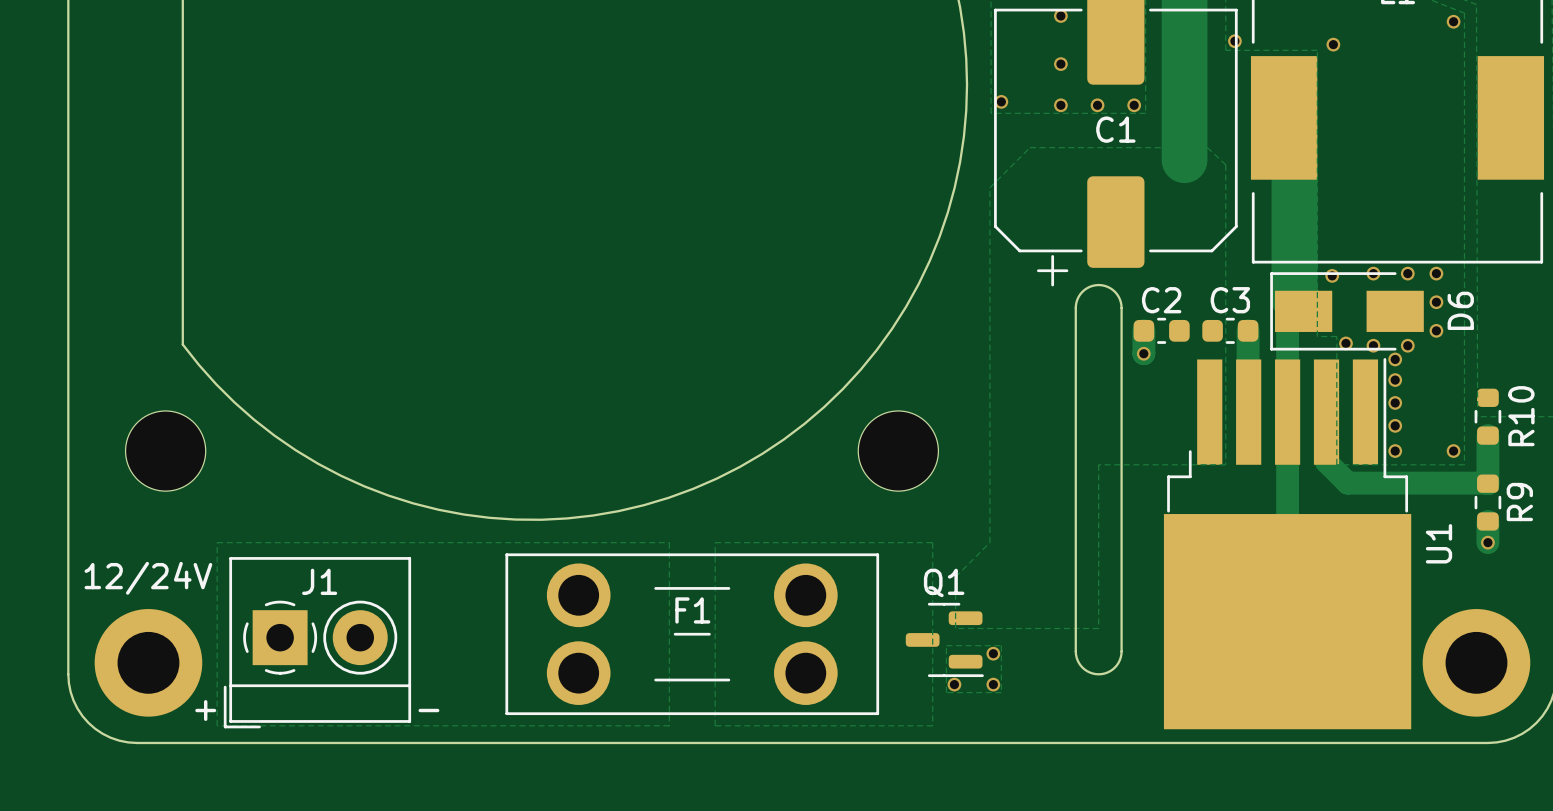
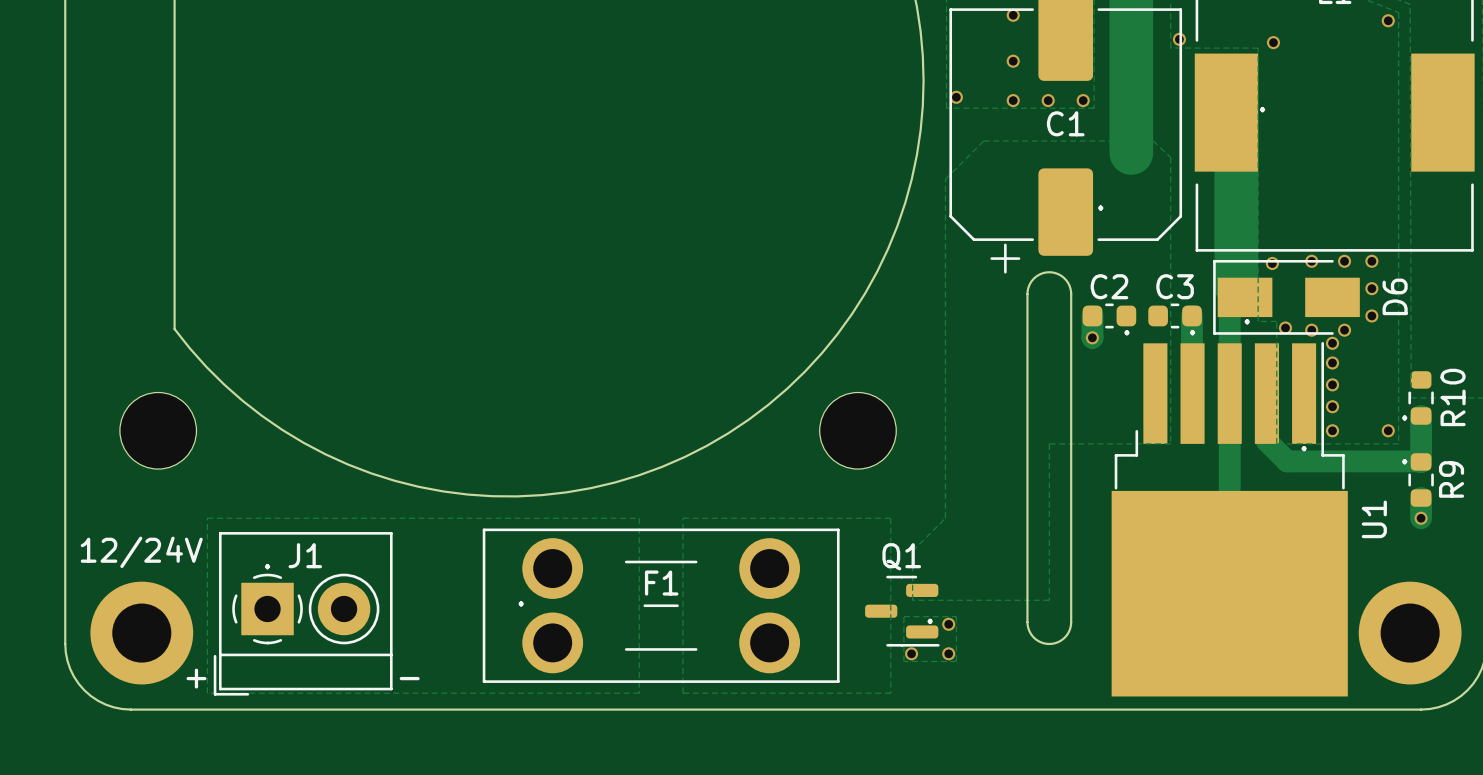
text: none -> . (1262, 109)
text: none -> . (1100, 208)
text: none -> . (1247, 321)
text: none -> . (1126, 332)
text: none -> . (1192, 332)
text: none -> . (1404, 417)
text: none -> . (1304, 448)
text: none -> . (1404, 461)
text: none -> . (267, 566)
text: none -> . (521, 603)
text: none -> . (930, 621)

